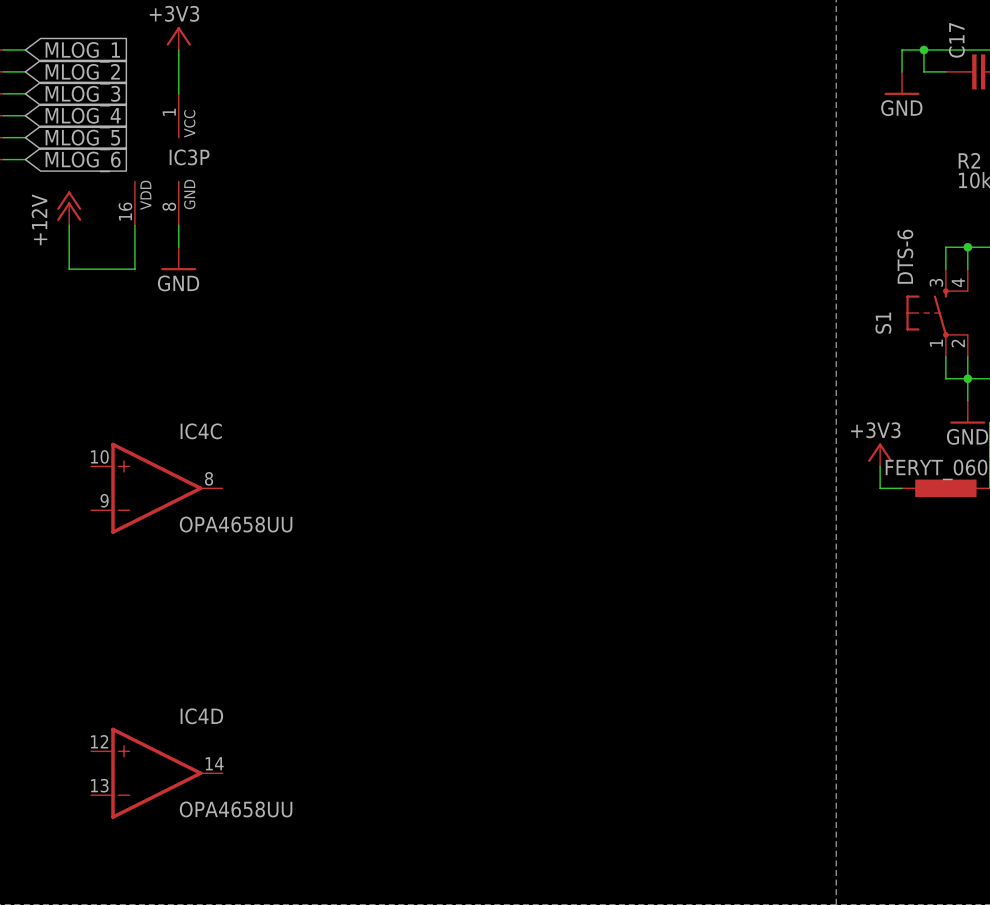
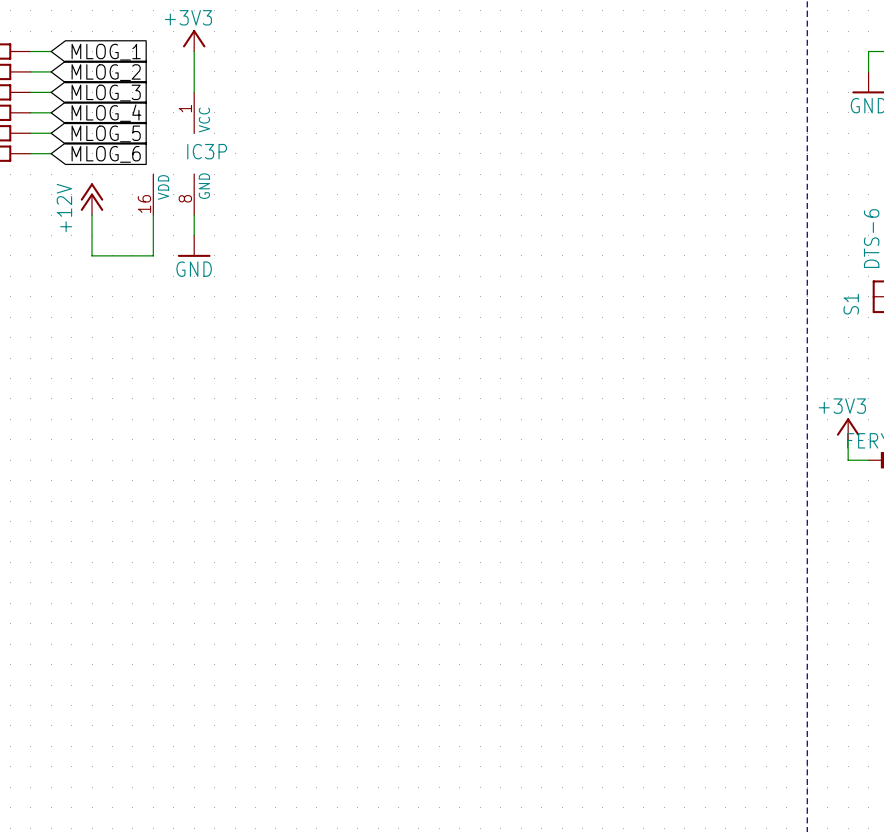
IC4C: OPA4658UU (156, 488) -> none
IC4D: OPA4658UU (156, 773) -> none

